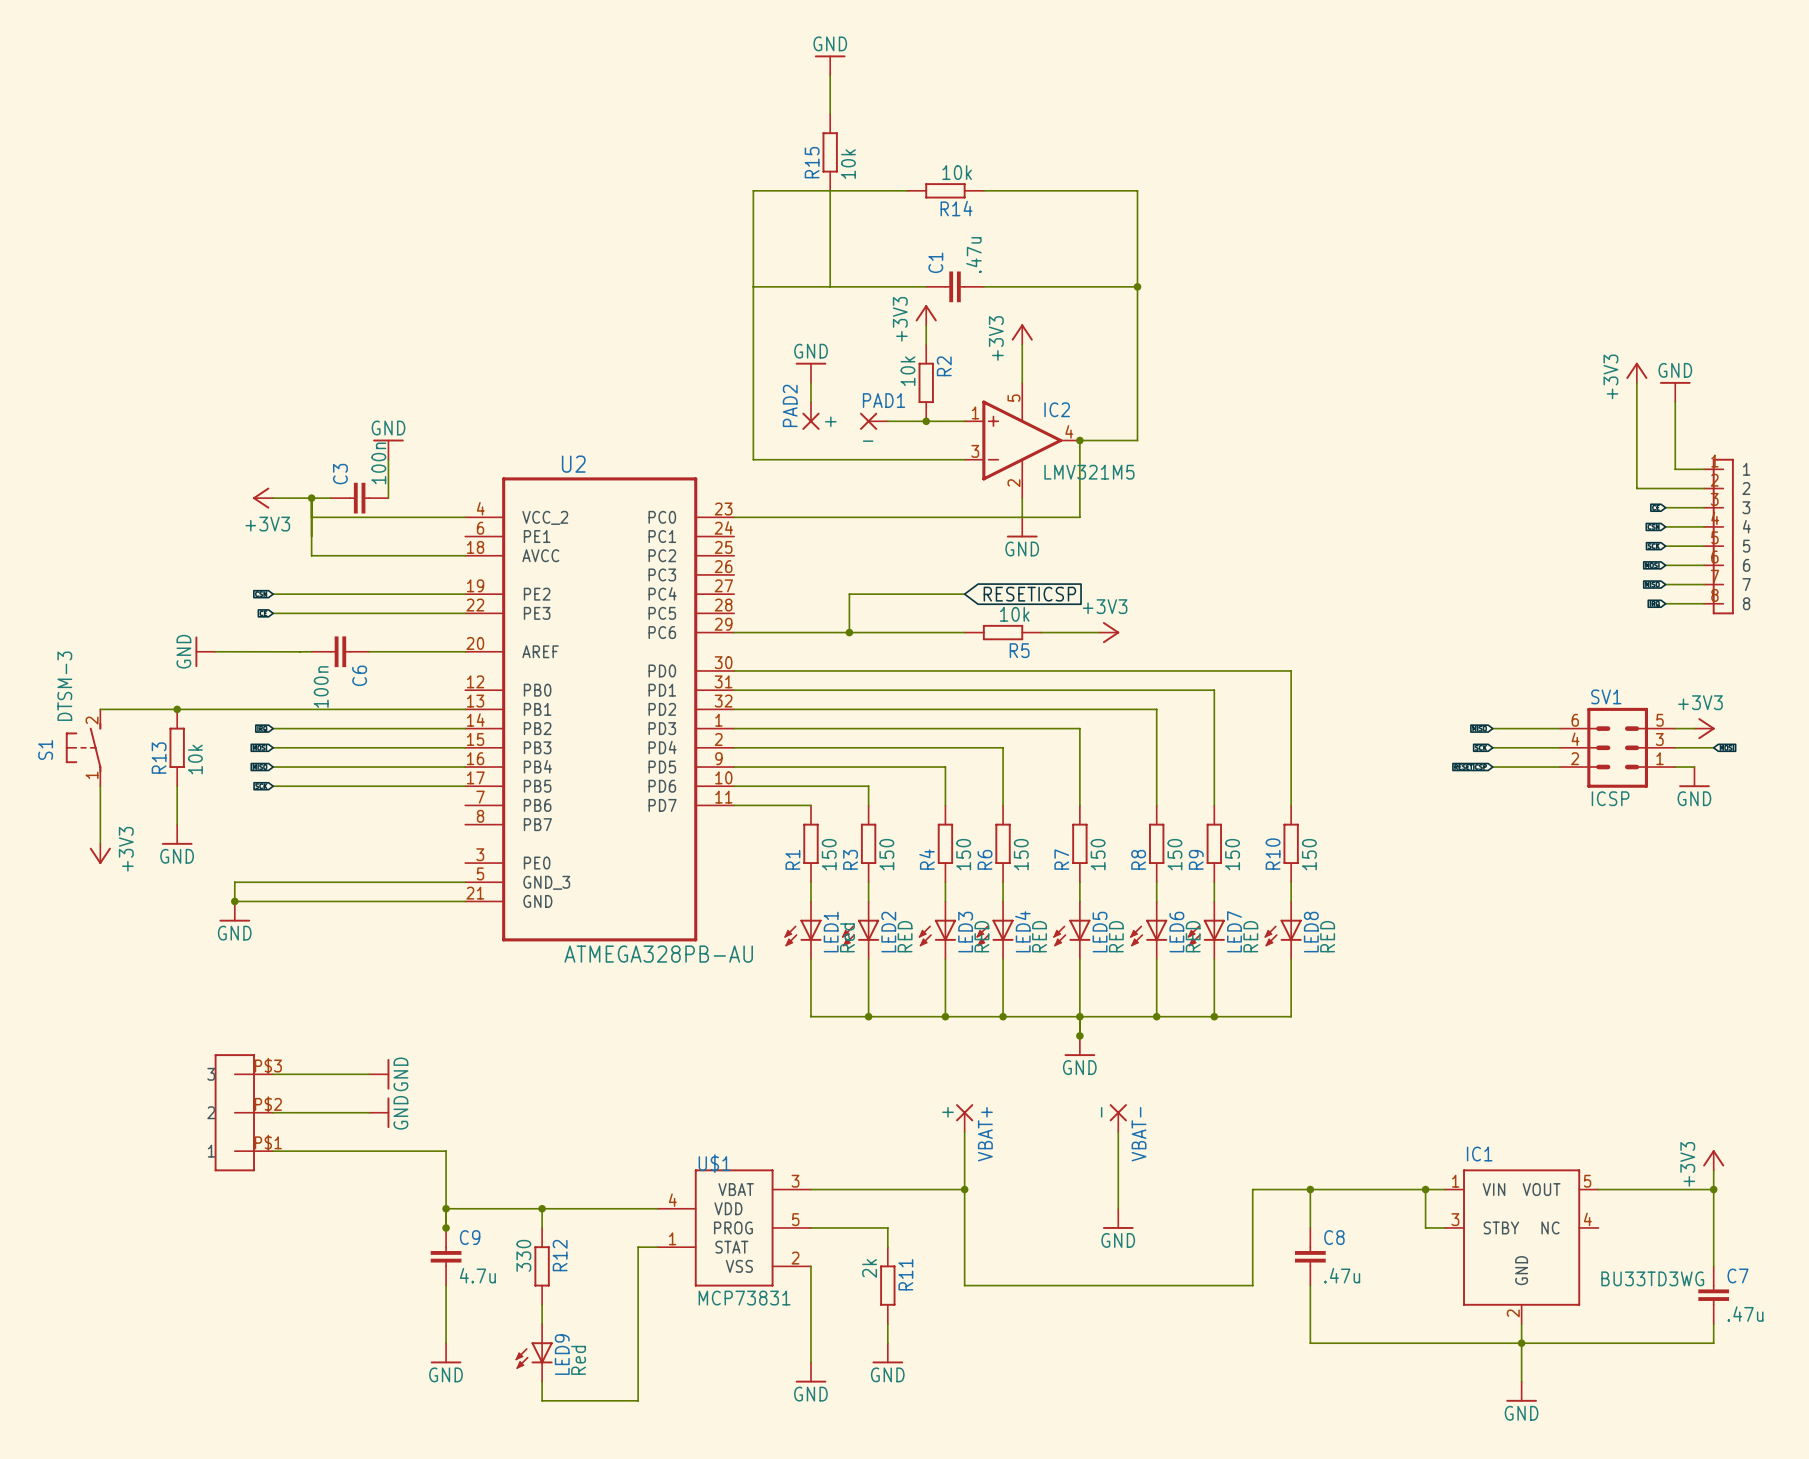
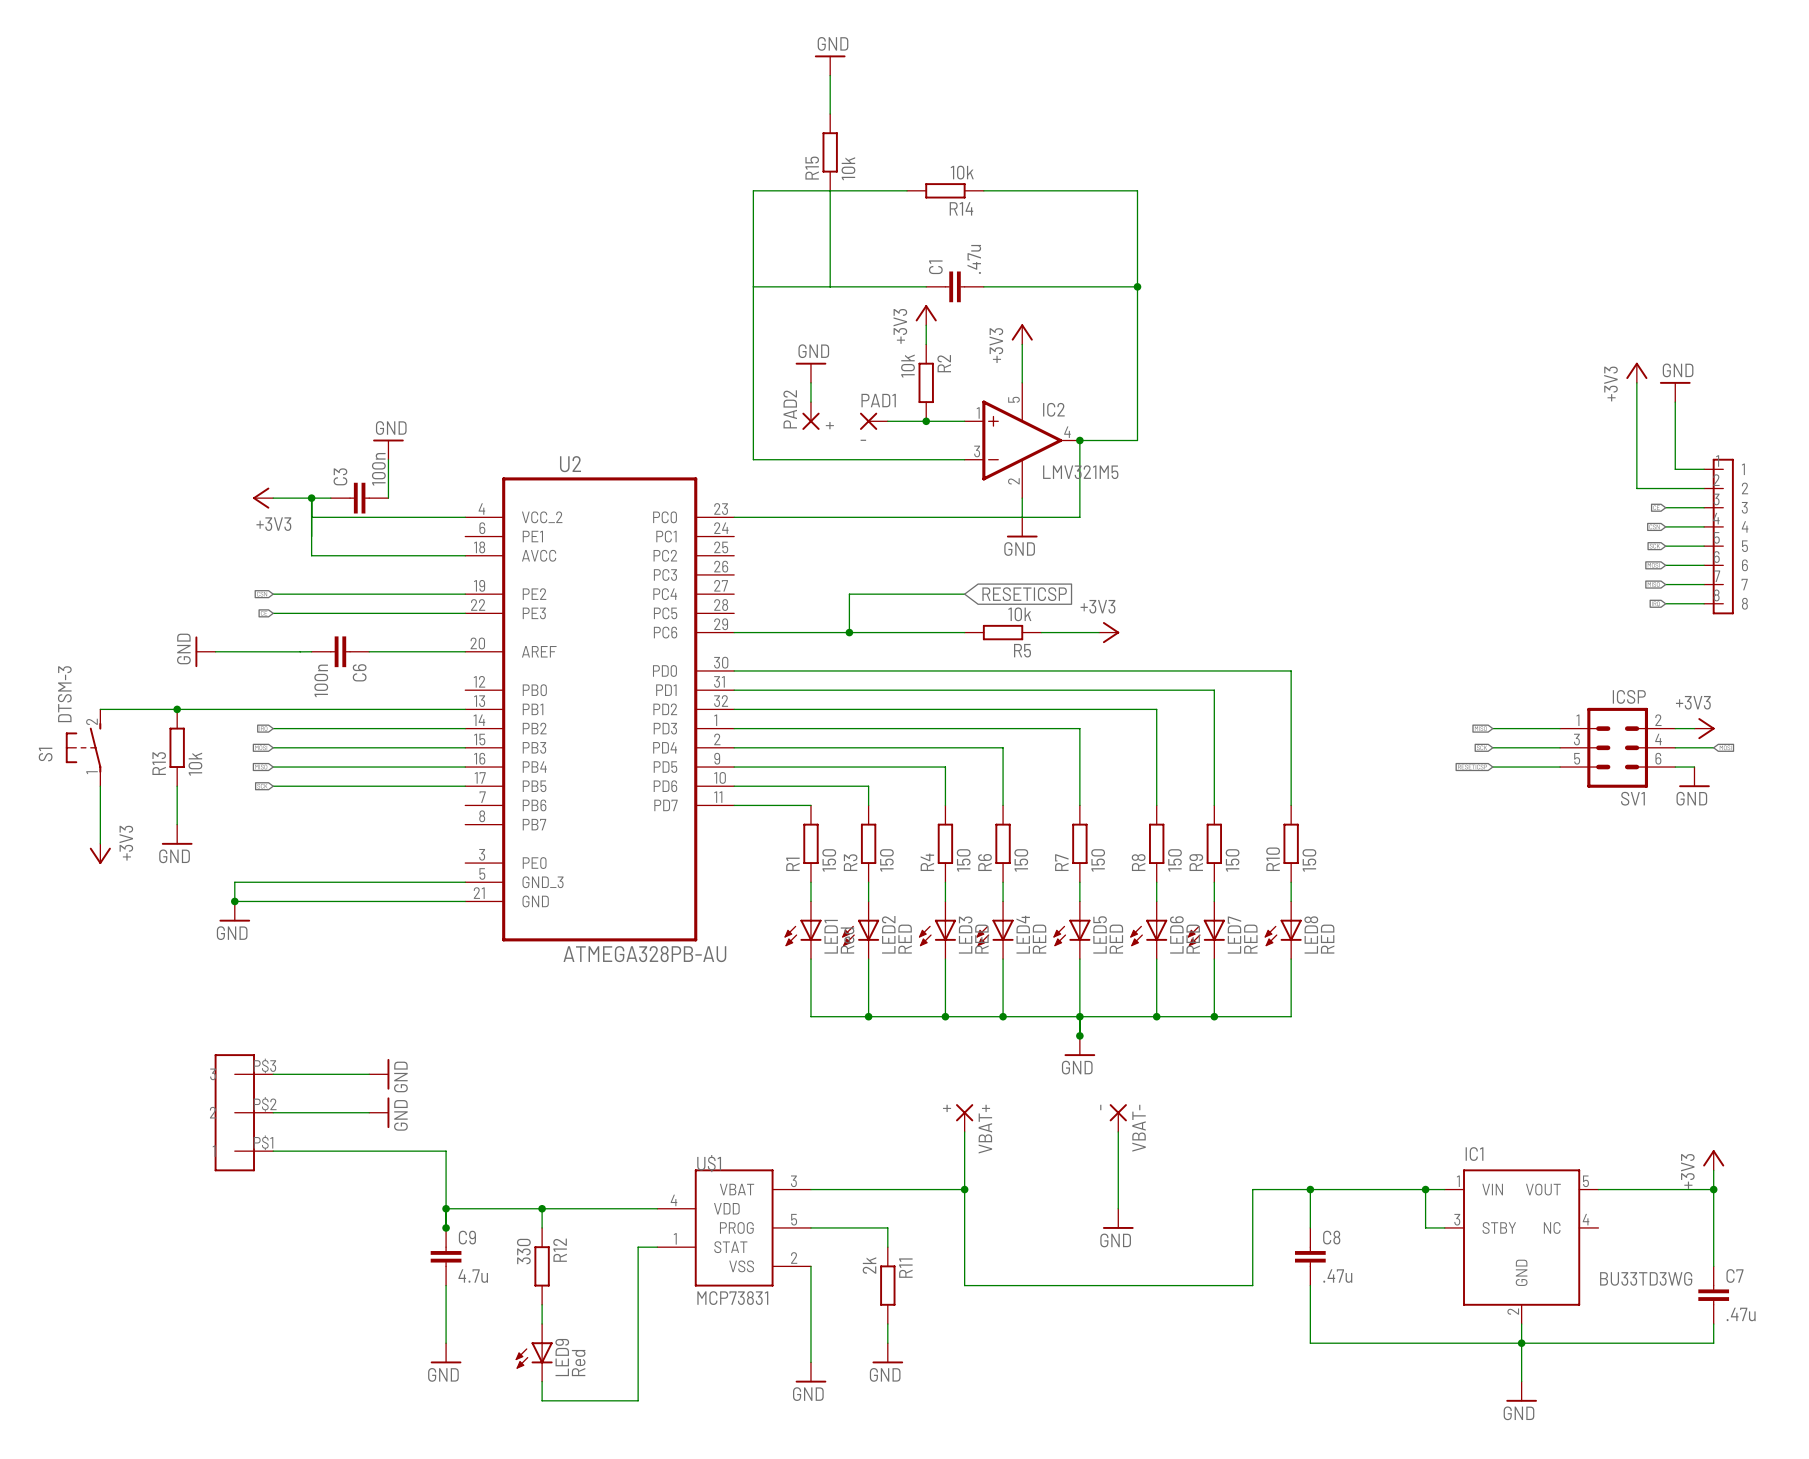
SV1 rotation: 0° (1617, 747) -> 180° (1617, 747)

